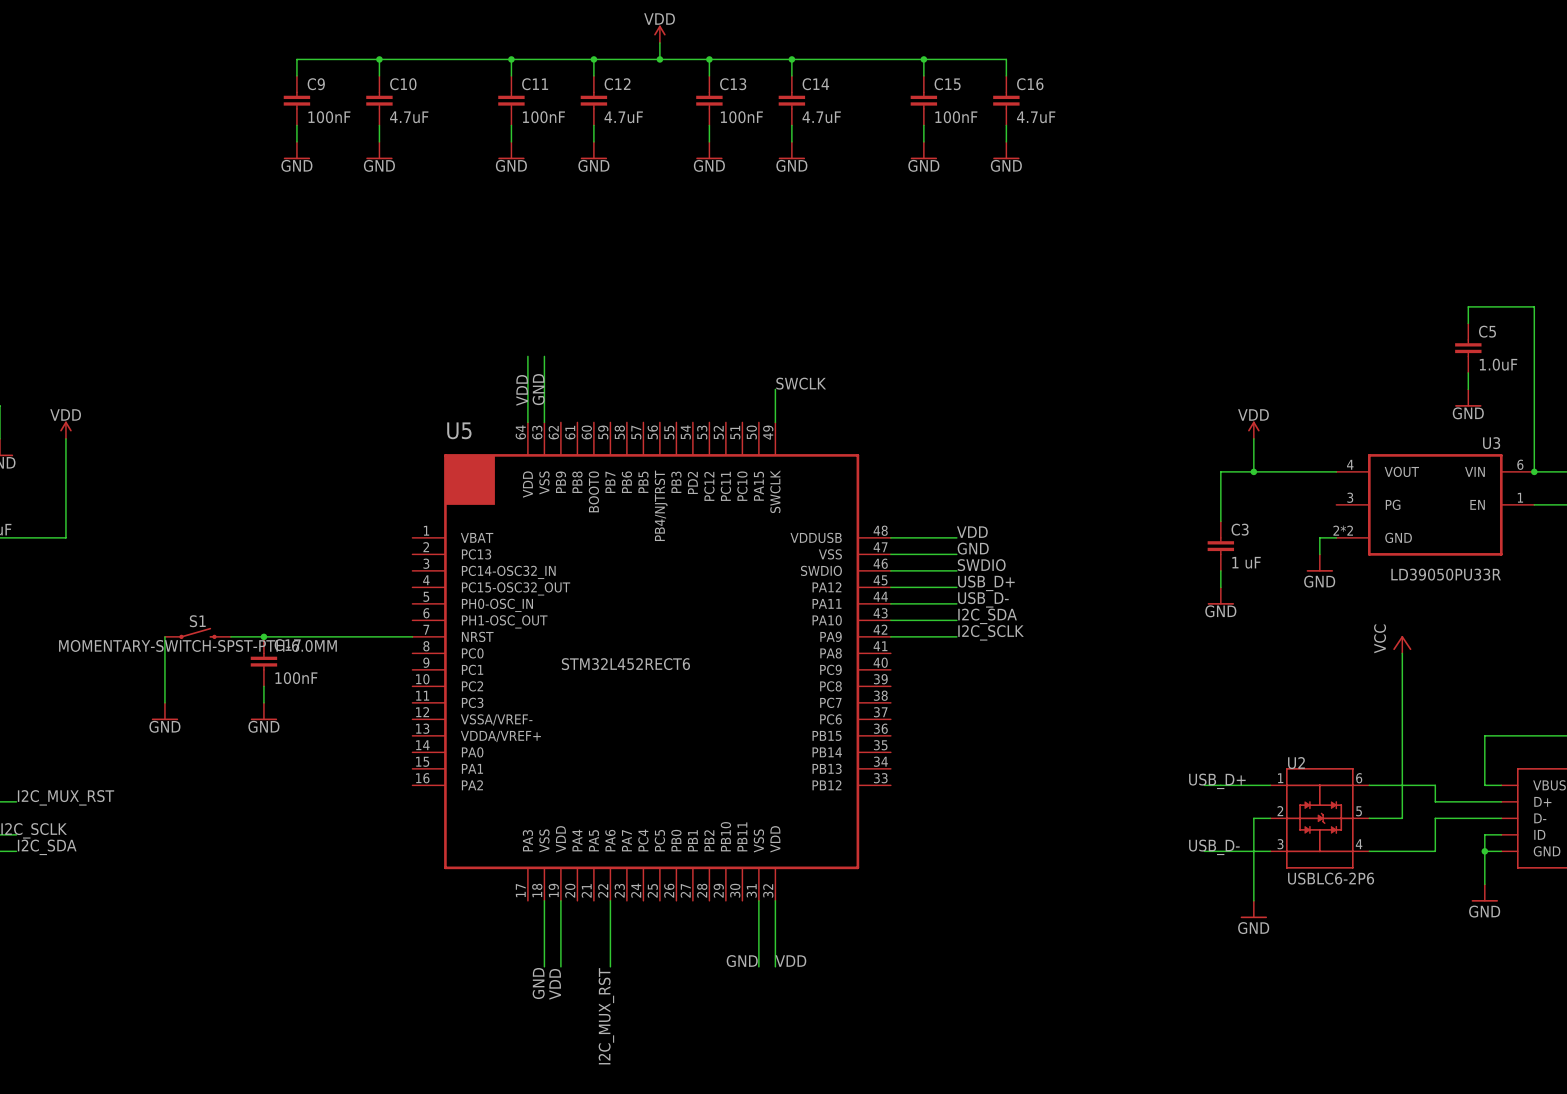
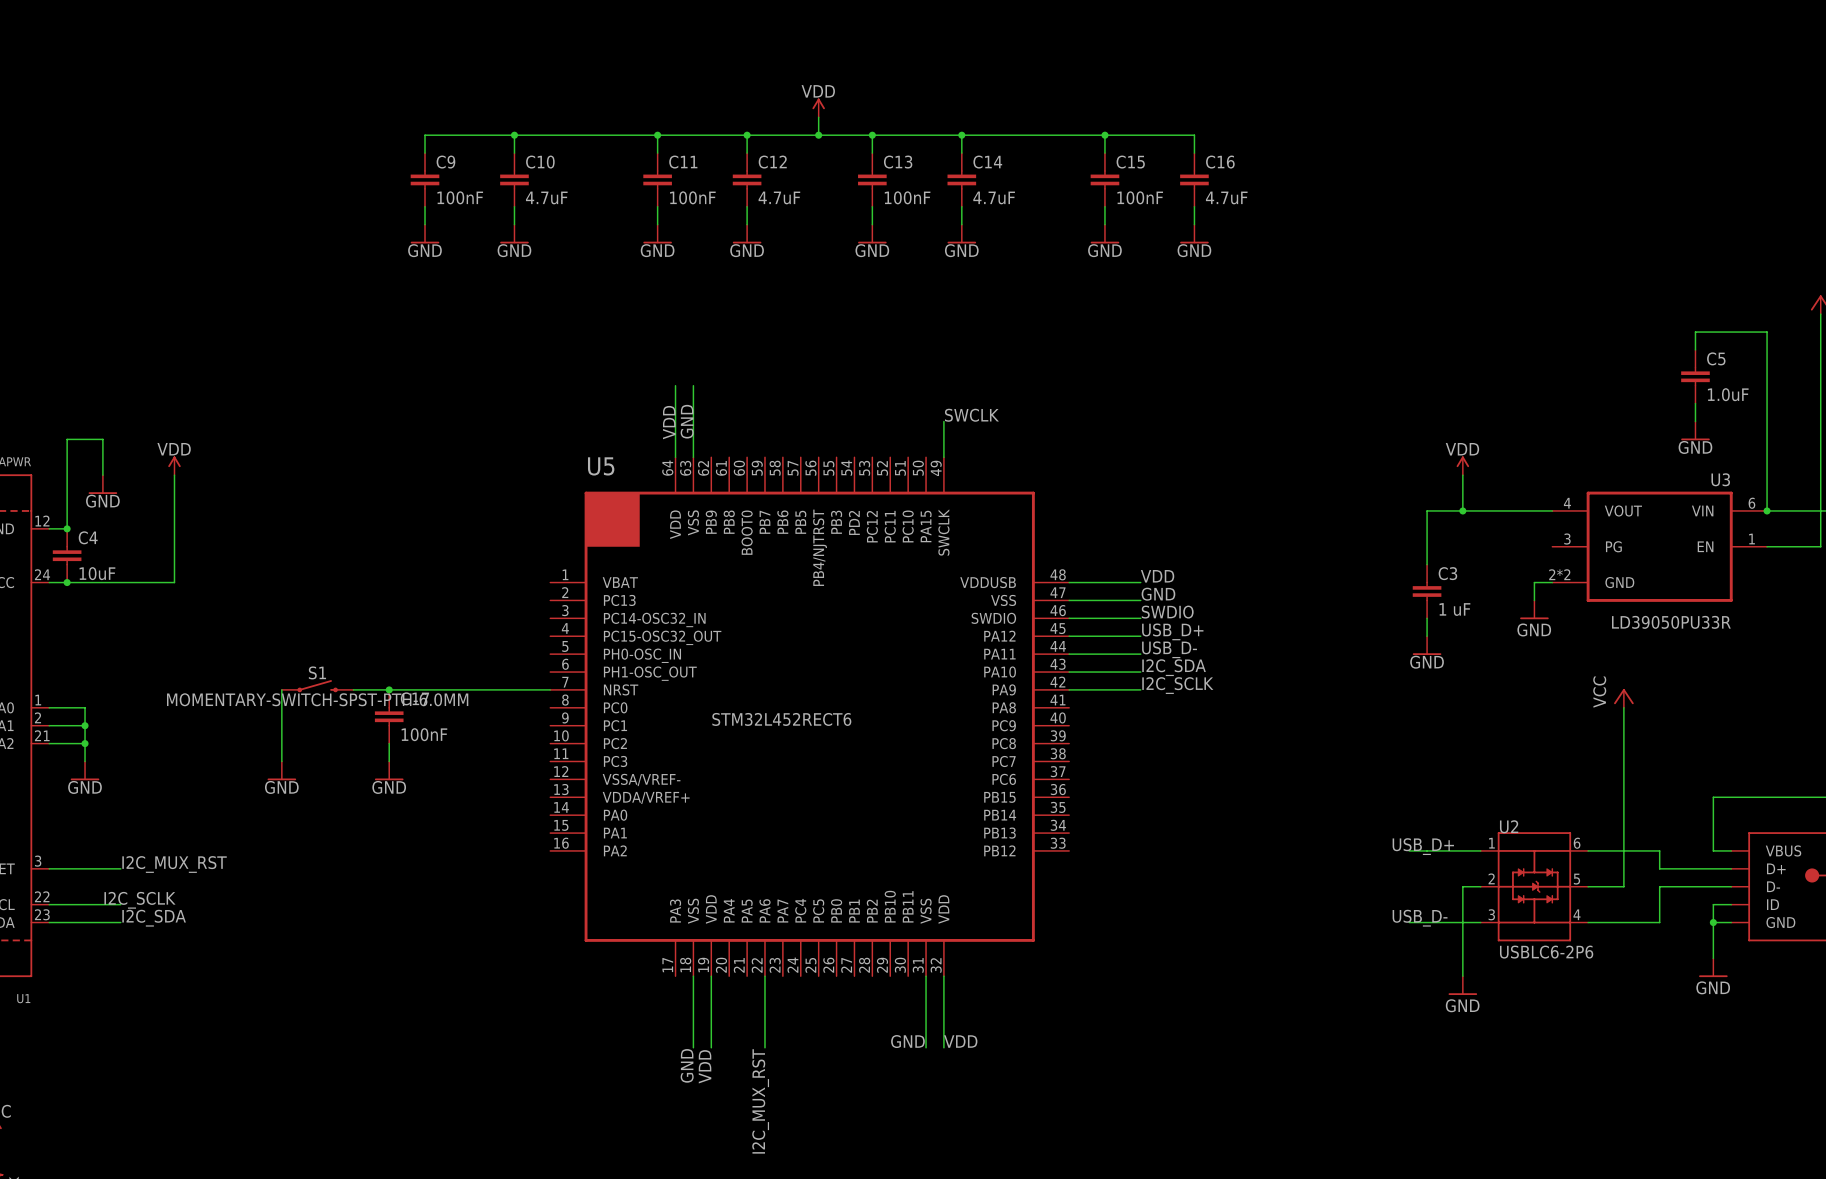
power symbol position: VDD (659, 34) -> VDD (818, 107)
wire: (659, 42) (659, 59) -> (818, 117) (818, 135)
wire: (379, 59) (379, 75) -> (514, 206) (514, 224)
junction: (379, 59) -> none
wire: (511, 59) (511, 75) -> (657, 206) (657, 224)
junction: (511, 59) -> none
wire: (593, 59) (593, 75) -> (747, 206) (747, 224)
junction: (593, 59) -> none
junction: (659, 59) -> none
wire: (709, 59) (709, 75) -> (872, 206) (872, 224)
junction: (709, 59) -> none
wire: (791, 59) (791, 75) -> (961, 206) (961, 224)
junction: (791, 59) -> none
wire: (923, 59) (923, 75) -> (1104, 206) (1104, 224)
junction: (923, 59) -> none
wire: (296, 75) (296, 59) (1006, 59) (1006, 75) -> none
C9 position: (296, 100) -> (425, 179)
C10 position: (379, 100) -> (514, 179)
C11 position: (511, 100) -> (657, 179)
C12 position: (593, 100) -> (747, 179)
C13 position: (709, 100) -> (872, 179)
C14 position: (791, 100) -> (961, 179)
C15 position: (923, 100) -> (1104, 179)
C16 position: (1006, 100) -> (1194, 179)
wire: none -> (425, 135) (1194, 135)
junction: none -> (514, 135)
junction: none -> (657, 135)
junction: none -> (747, 135)
junction: none -> (818, 135)
junction: none -> (872, 135)
junction: none -> (961, 135)
junction: none -> (1104, 135)
power symbol: GND (296, 150) -> none
power symbol: GND (379, 150) -> none
power symbol: GND (511, 150) -> none
power symbol: GND (593, 150) -> none
power symbol: GND (709, 150) -> none
power symbol: GND (791, 150) -> none
power symbol: GND (923, 150) -> none
power symbol: GND (1006, 150) -> none
wire: none -> (425, 206) (425, 224)
wire: none -> (1194, 206) (1194, 224)
power symbol: none -> GND (425, 234)
power symbol: none -> GND (514, 234)
power symbol: none -> GND (657, 234)
power symbol: none -> GND (747, 234)
power symbol: none -> GND (872, 234)
power symbol: none -> GND (961, 234)
power symbol: none -> GND (1104, 234)
power symbol: none -> GND (1194, 234)

